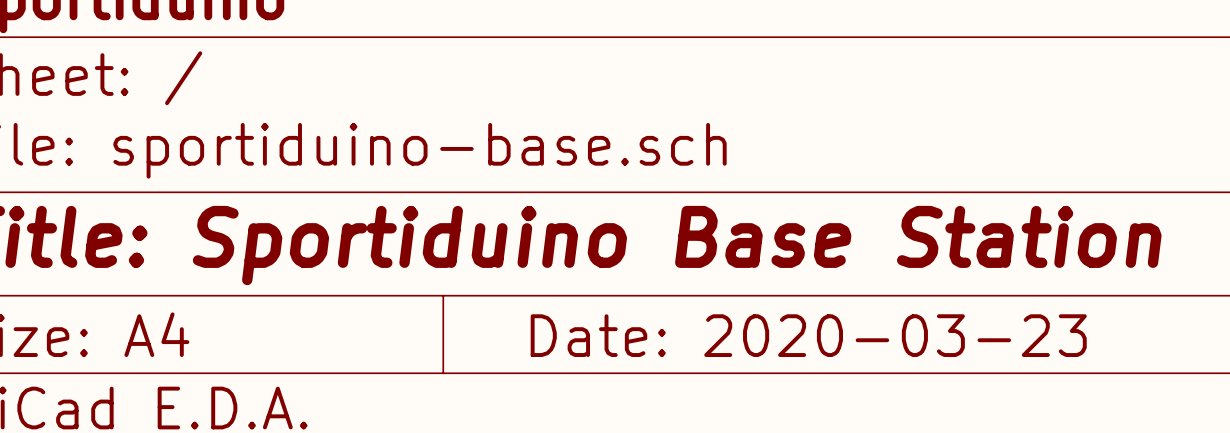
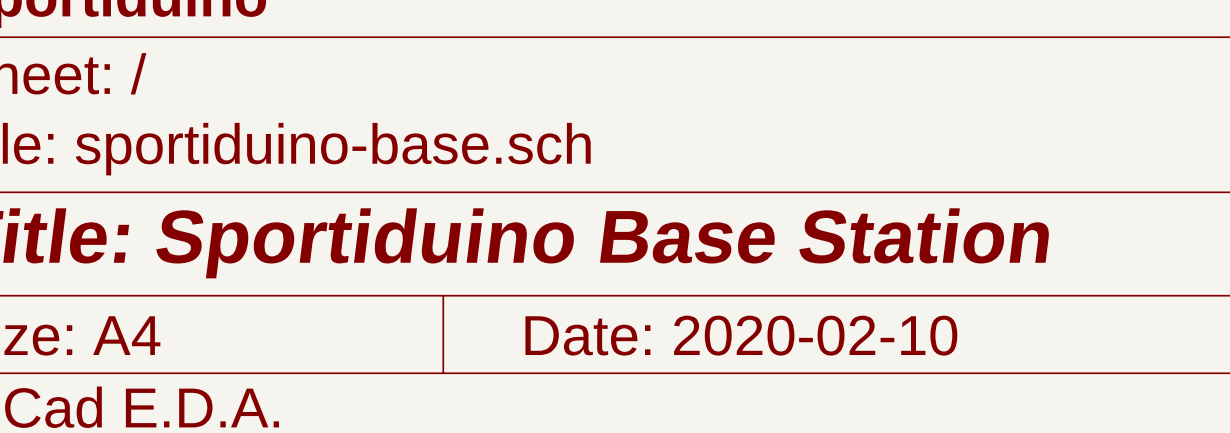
title block: Date: 2020-03-23 (808, 335) -> Date: 2020-02-10 (741, 335)

